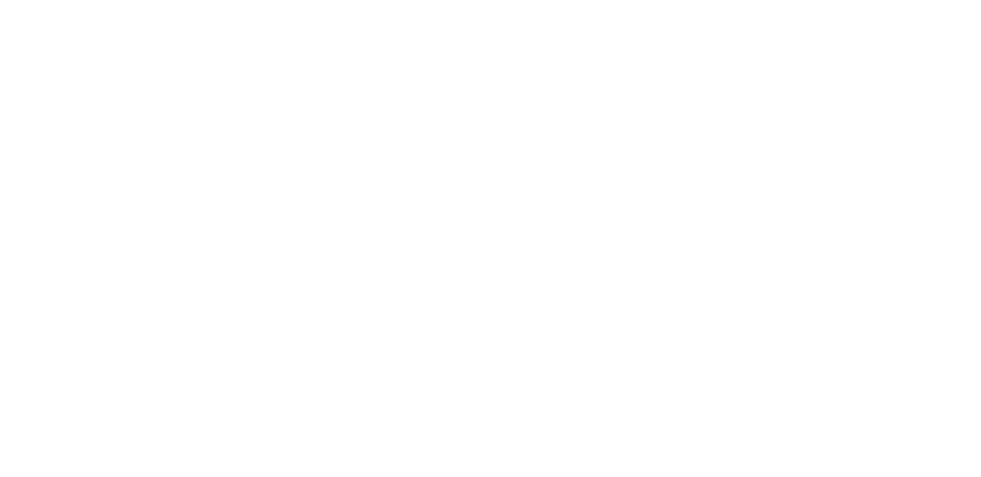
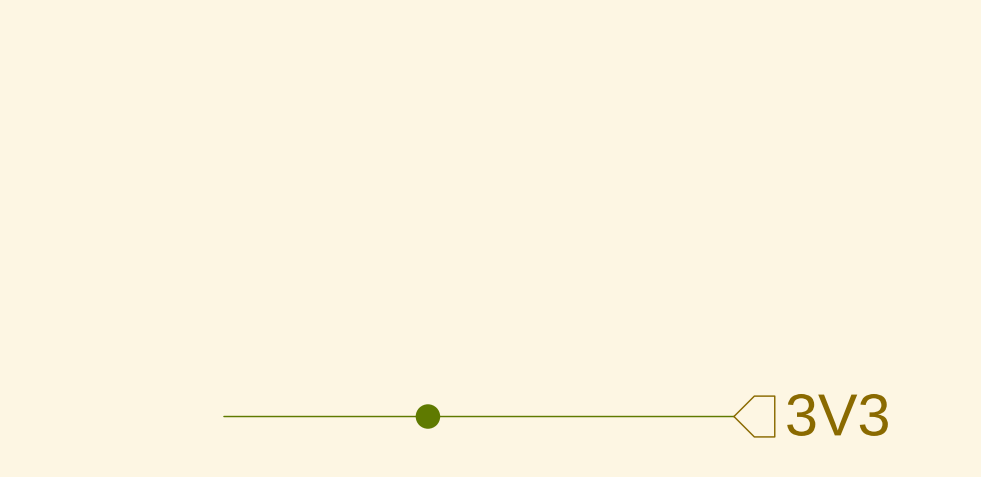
hierarchical label: none -> 3V3 (837, 414)
wire: none -> (223, 416) (733, 416)
junction: none -> (427, 416)

